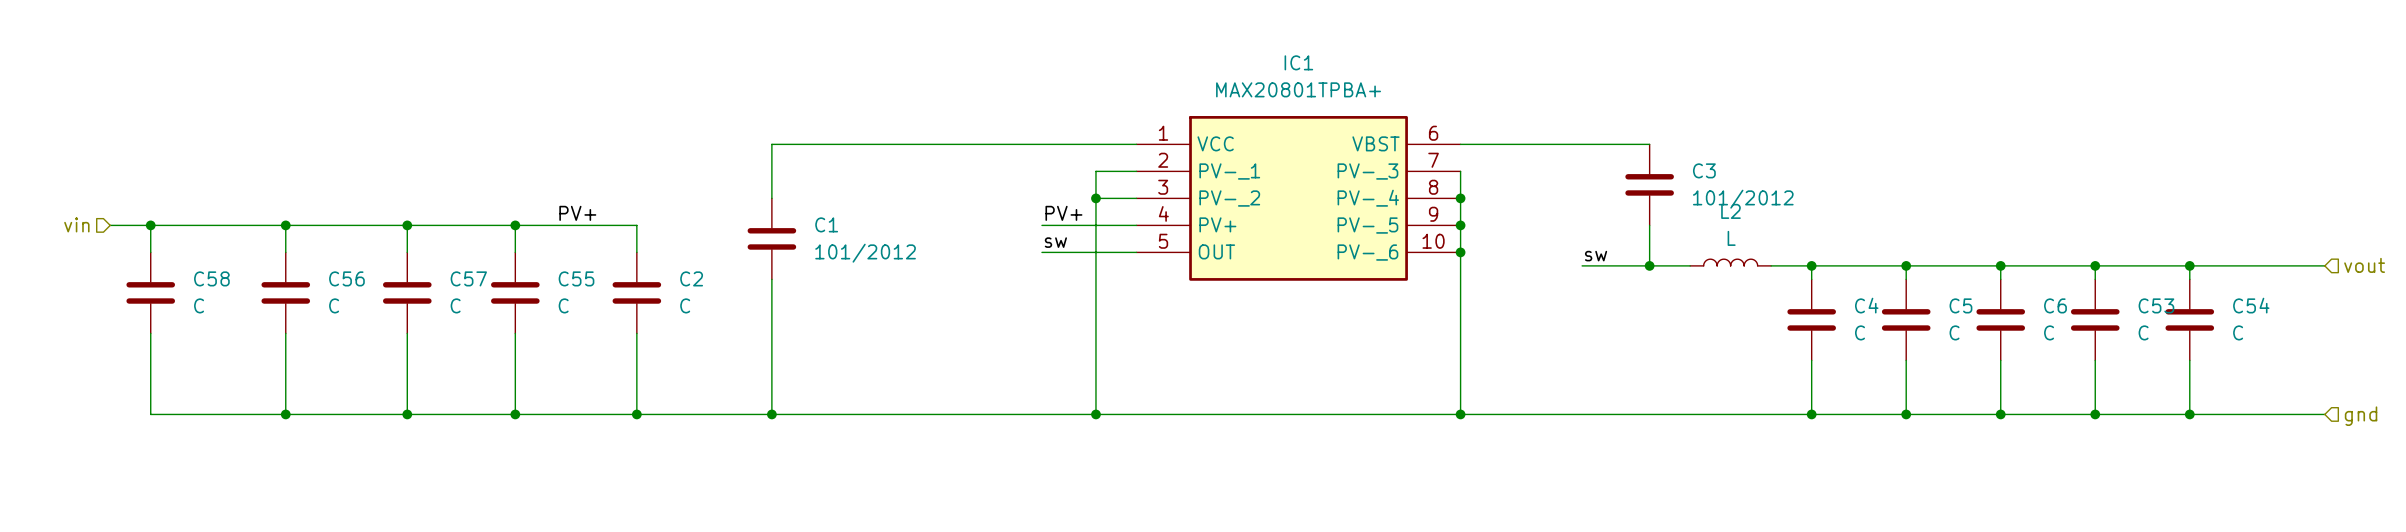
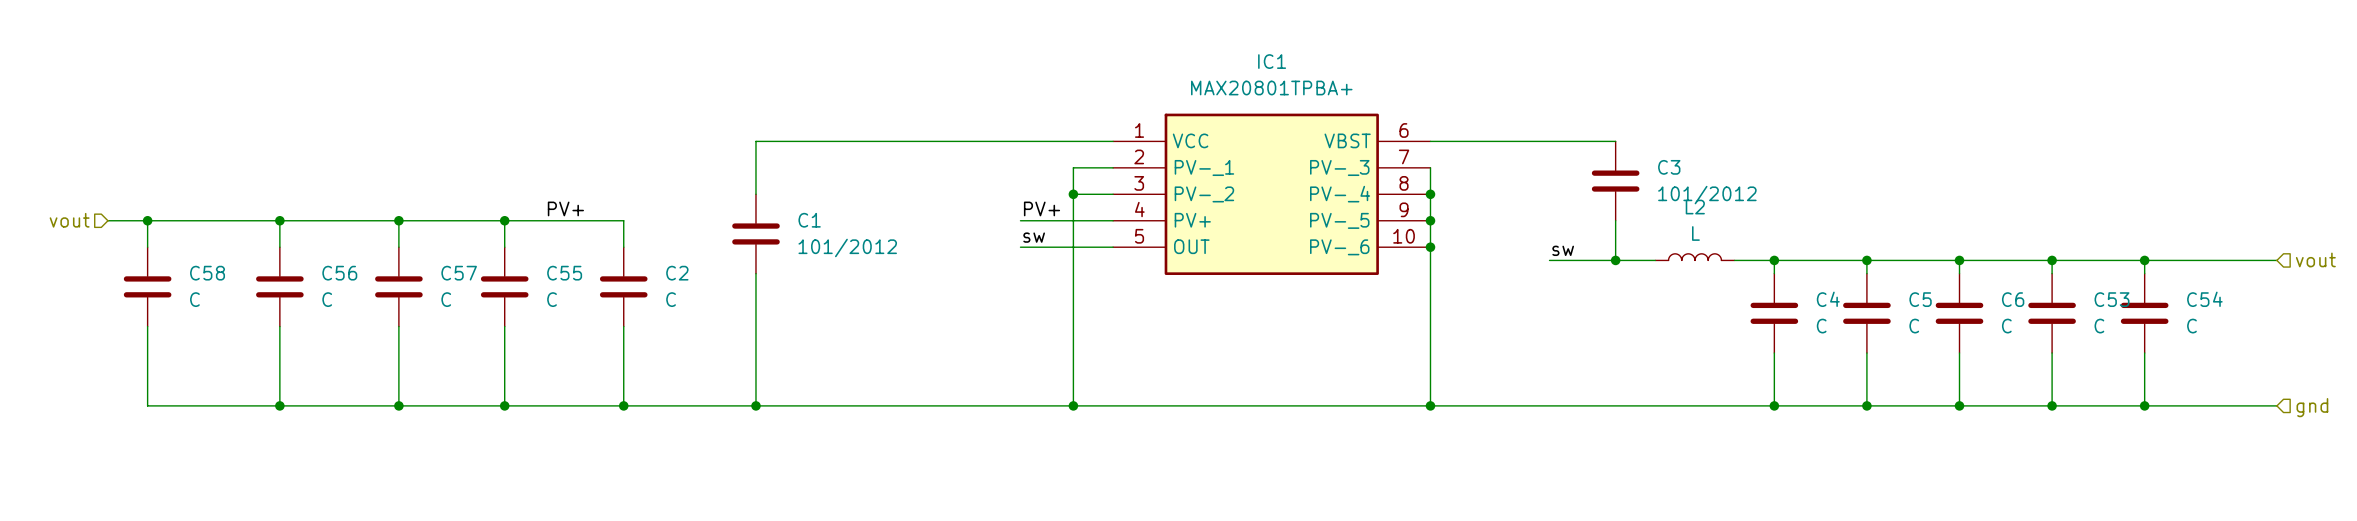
hierarchical label: vin (76, 224) -> vout (69, 220)

